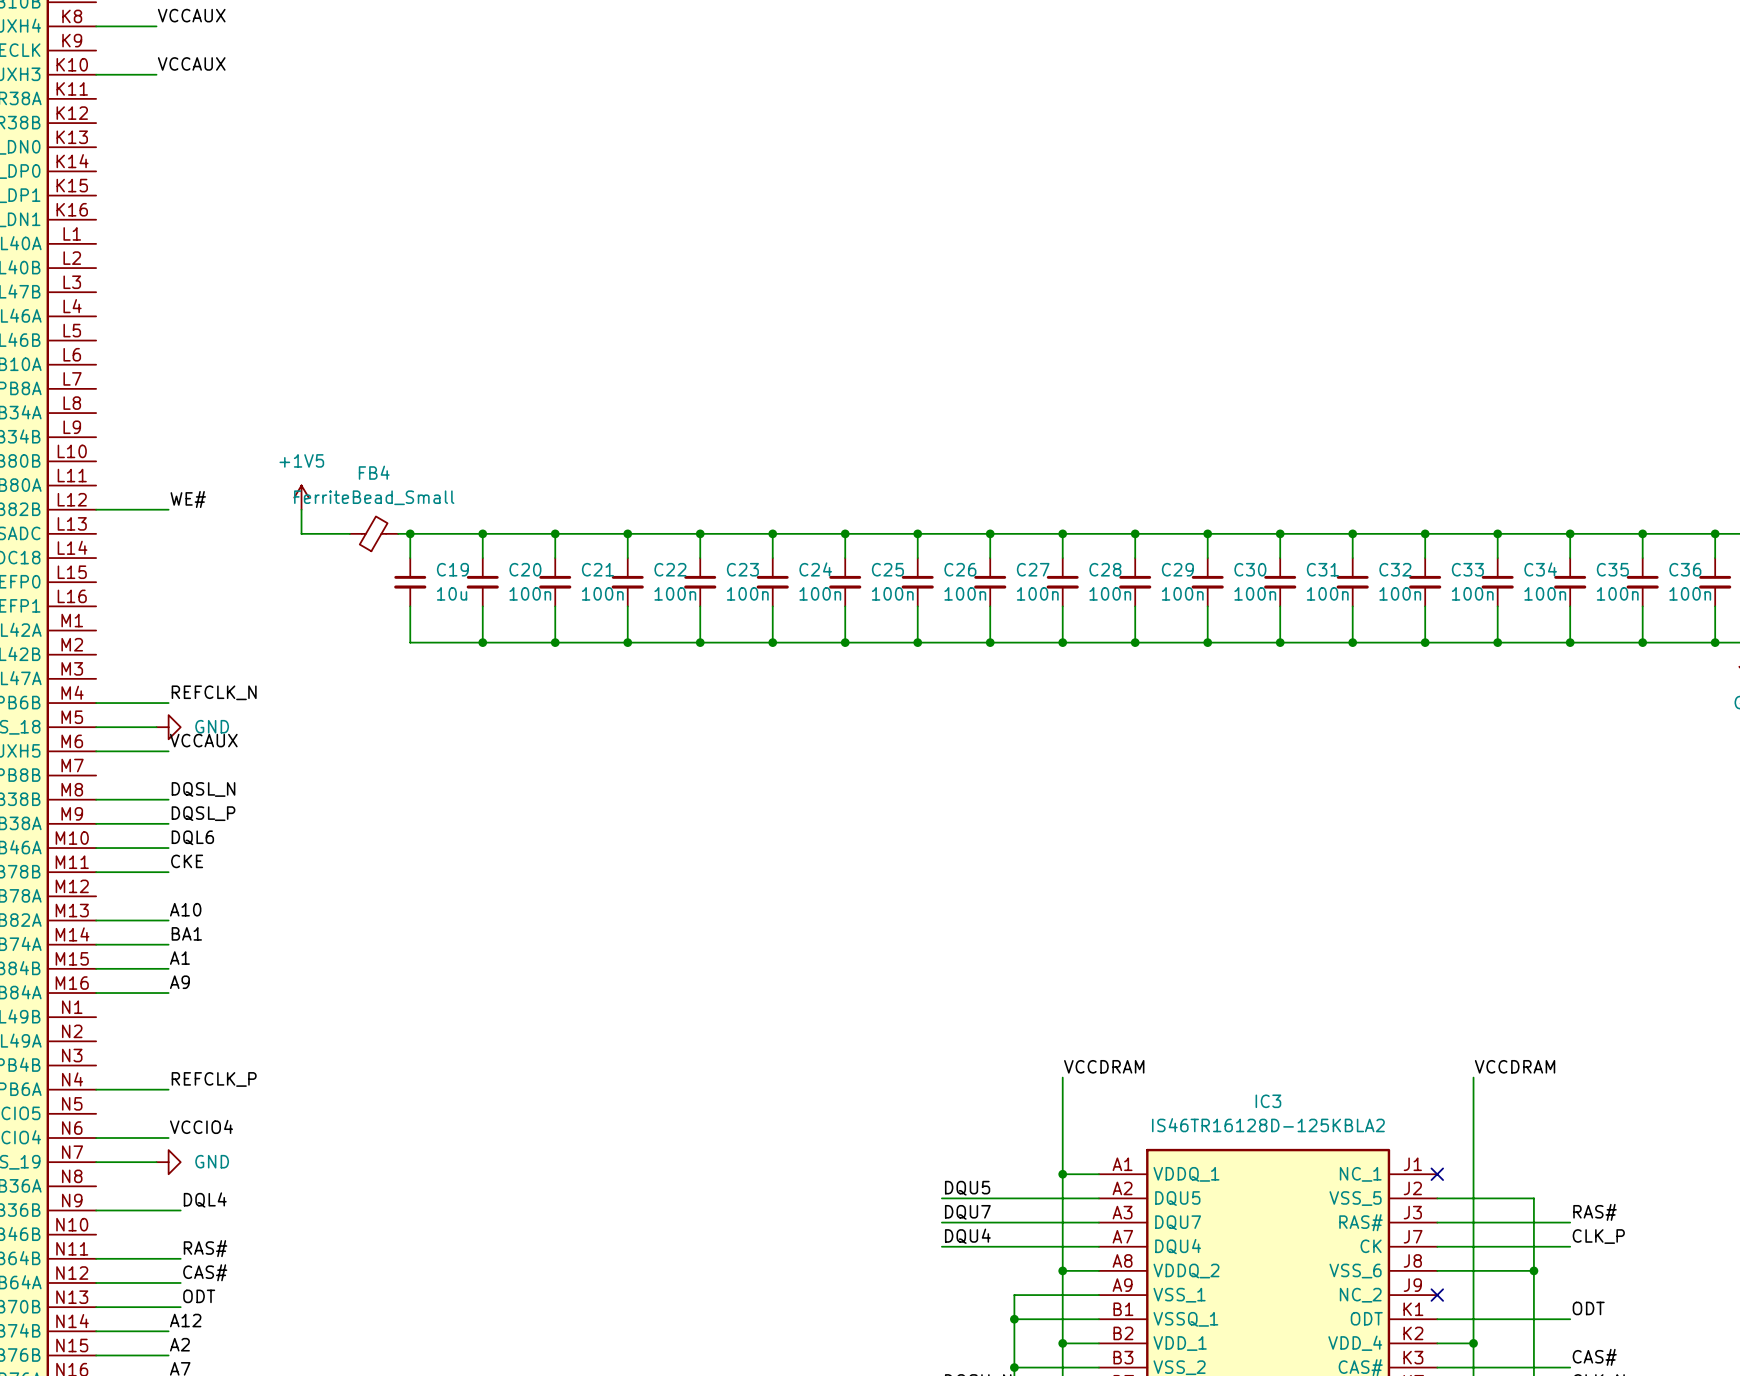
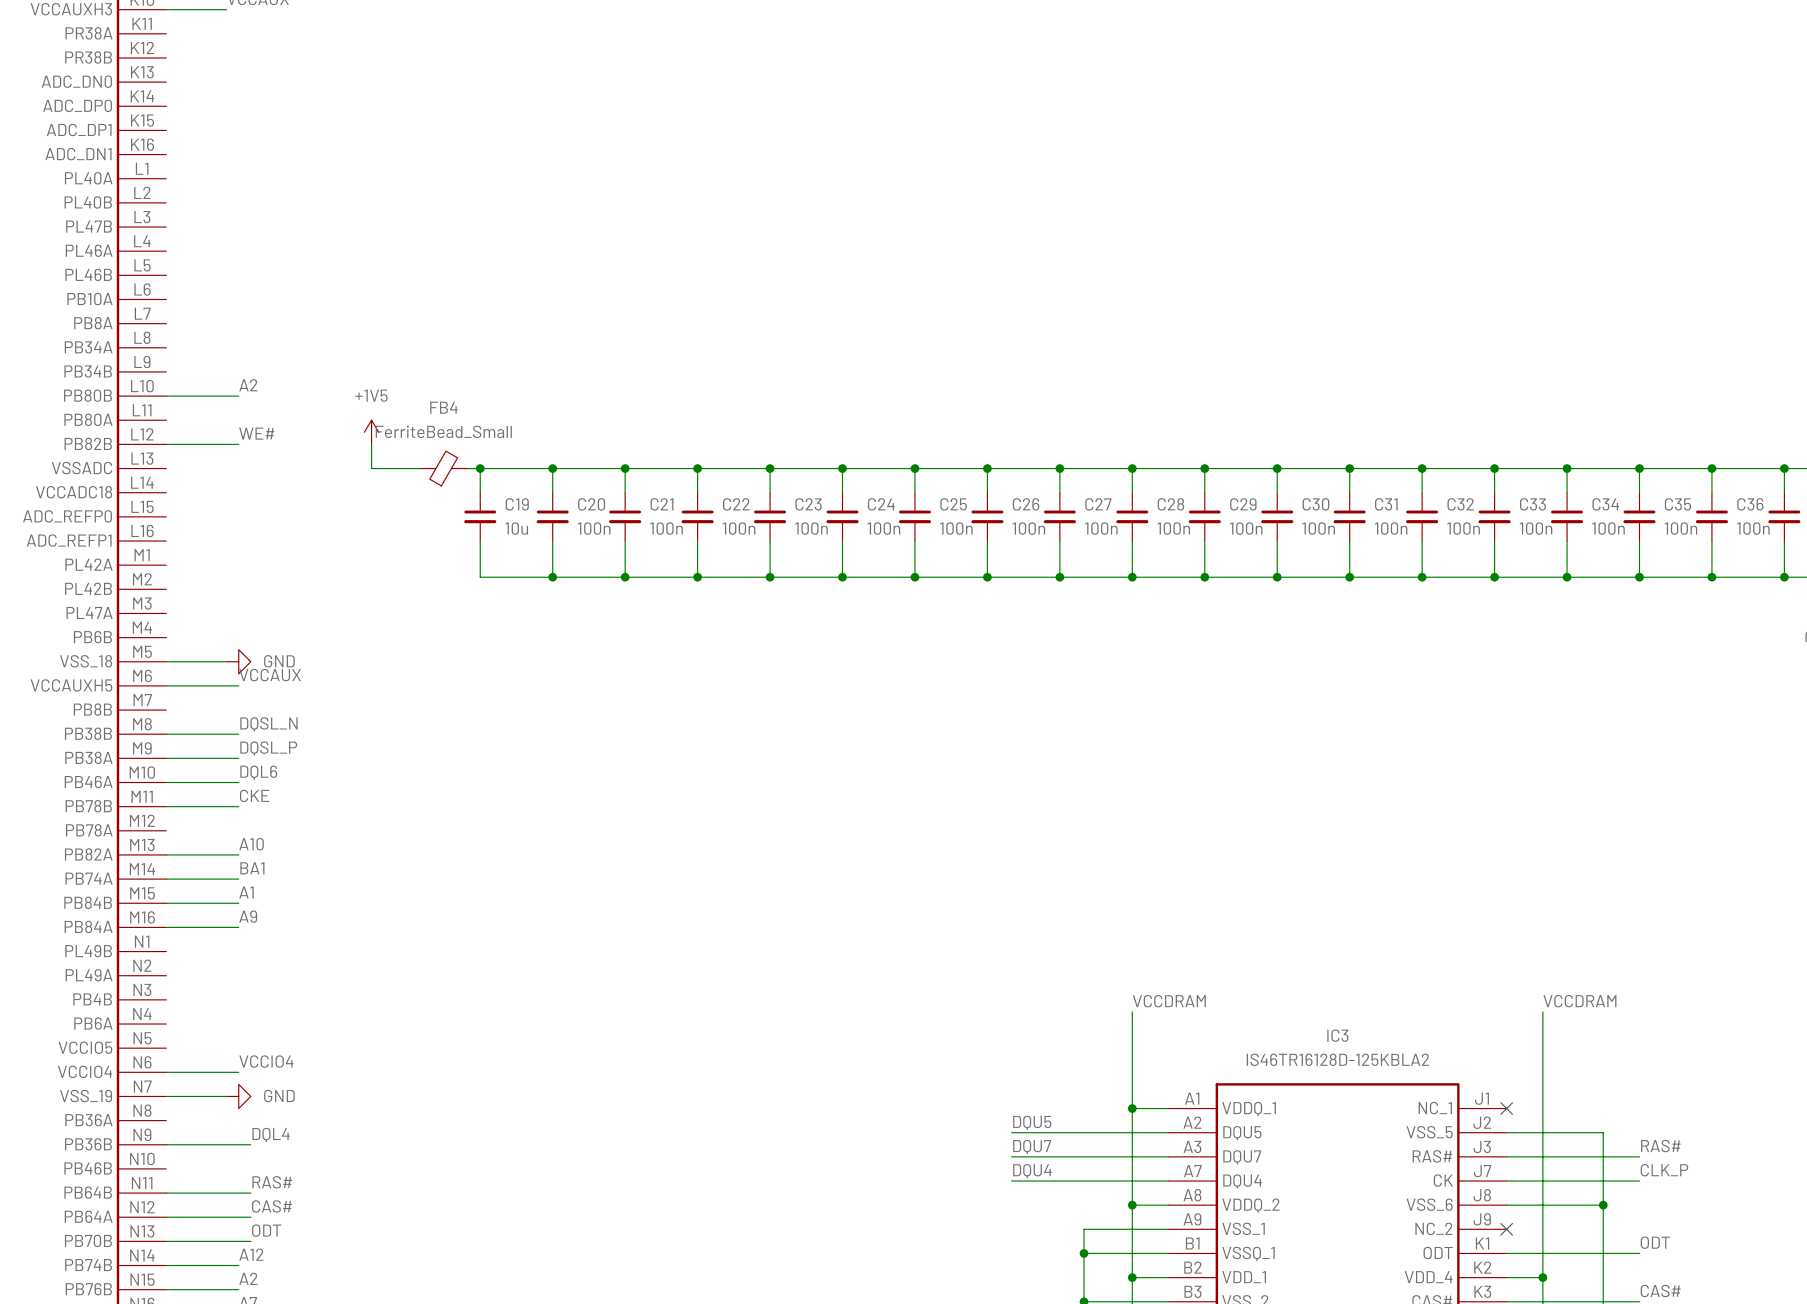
label: none -> A2 (248, 385)
wire: none -> (166, 396) (238, 396)
label: REFCLK_N (214, 692) -> none
wire: (96, 703) (168, 703) -> none
label: REFCLK_P (214, 1079) -> none
wire: (96, 1089) (168, 1089) -> none

